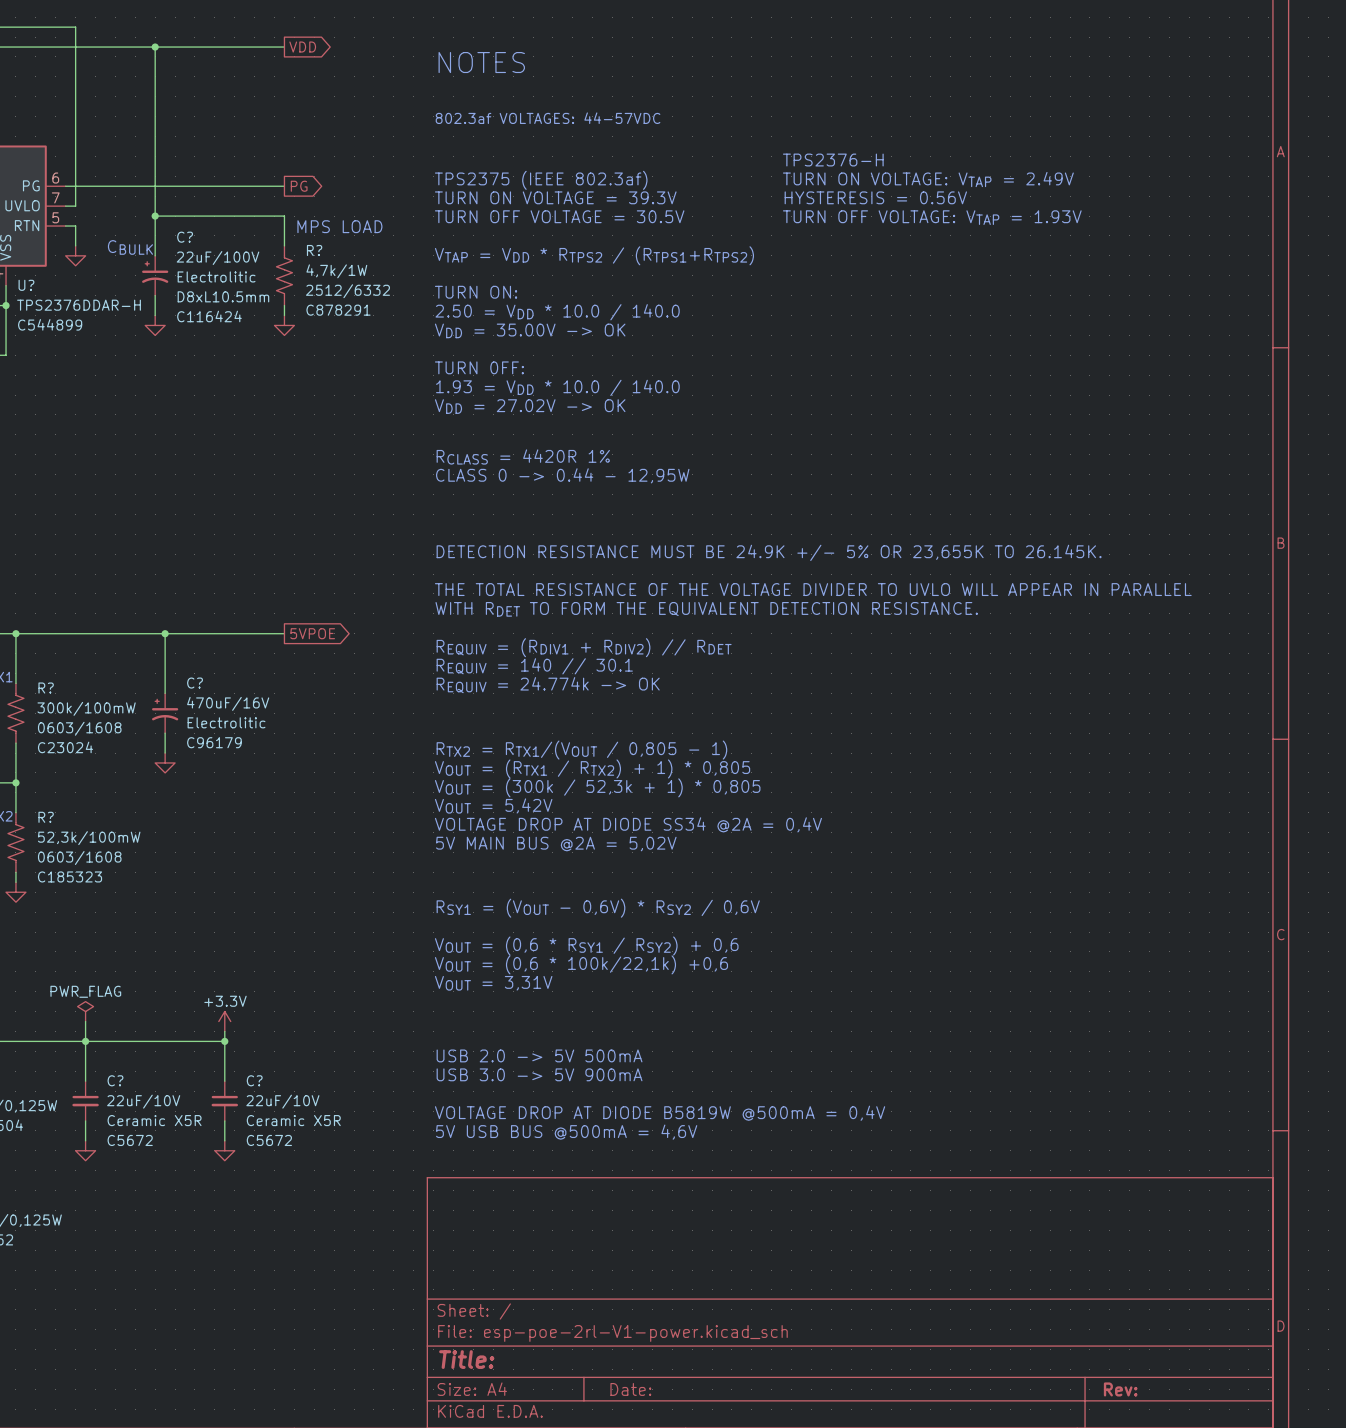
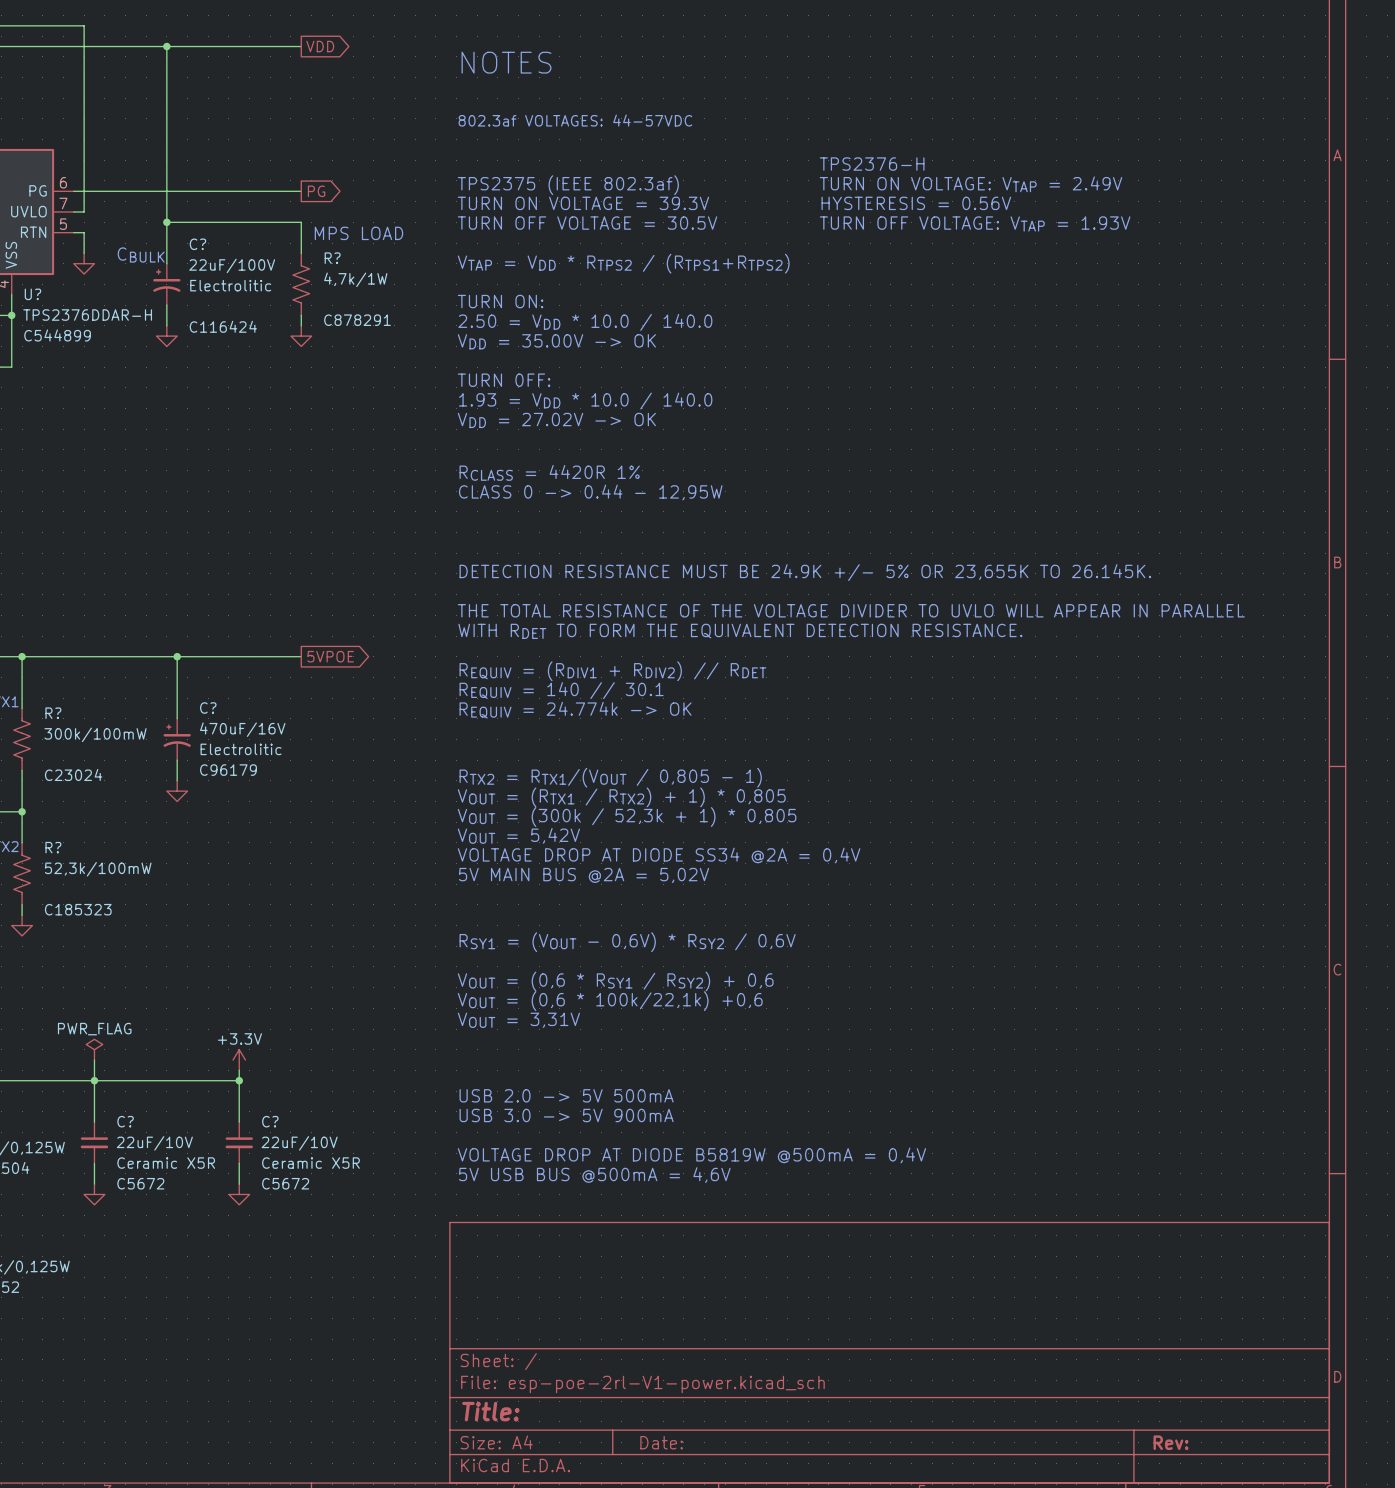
R? text: 2512/6332 (347, 291) -> none
C? text: D8xL10.5mm (223, 296) -> none
R? text: 0603/1608 (79, 728) -> none
R? text: 0603/1608 (79, 858) -> none

